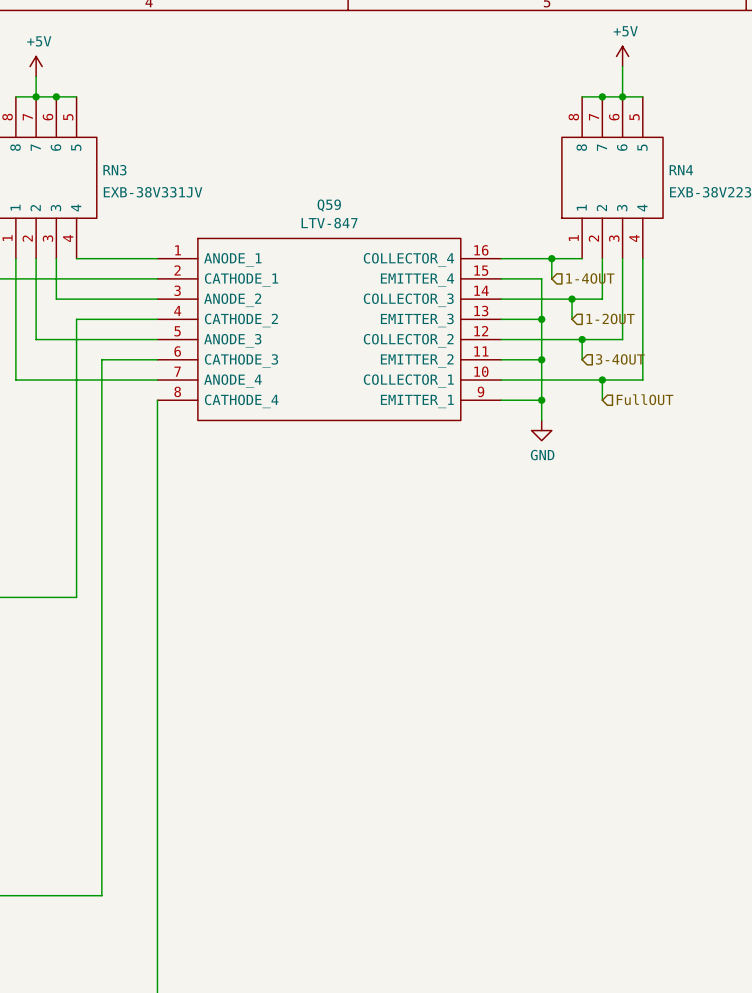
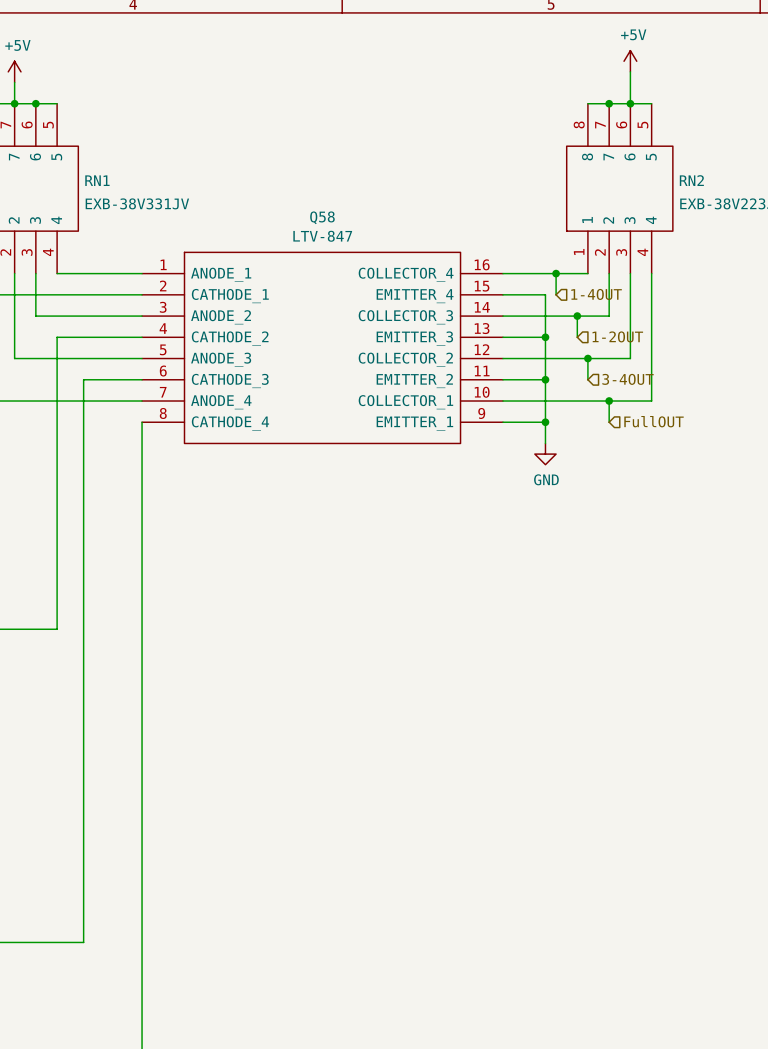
RN3 name: RN3 (114, 170) -> RN1 (97, 180)
RN4 name: RN4 (681, 170) -> RN2 (691, 180)
Q59 name: Q59 (329, 205) -> Q58 (322, 217)

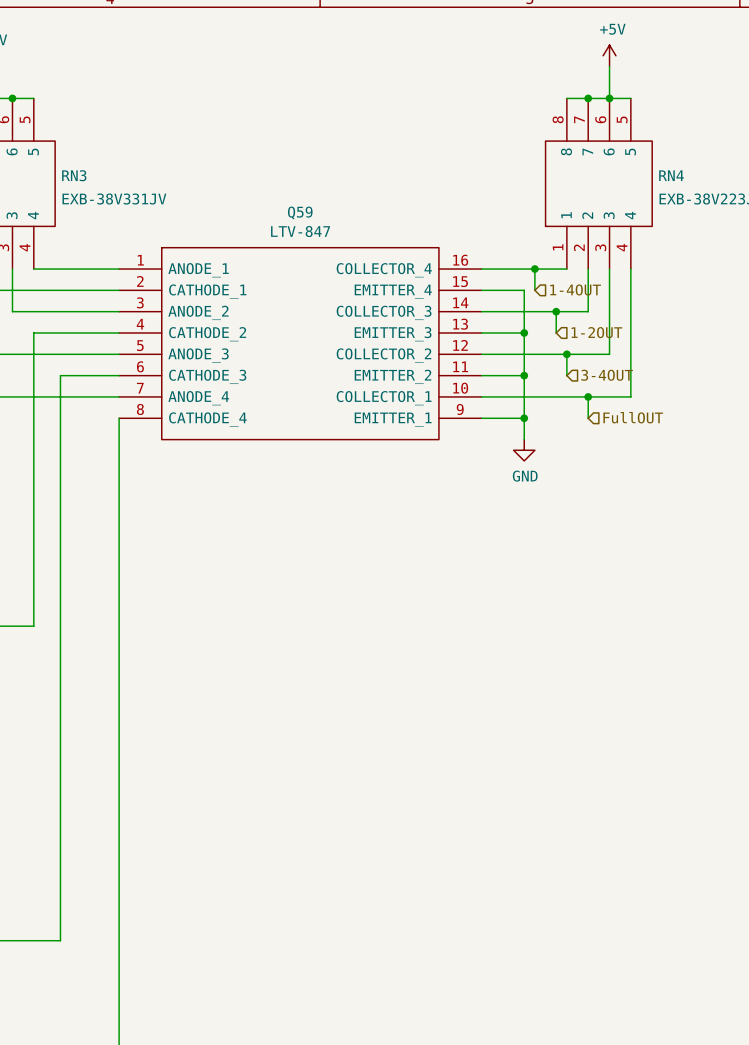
RN1 name: RN1 (97, 180) -> RN3 (74, 175)
RN2 name: RN2 (691, 180) -> RN4 (671, 175)
Q58 name: Q58 (322, 217) -> Q59 (300, 212)

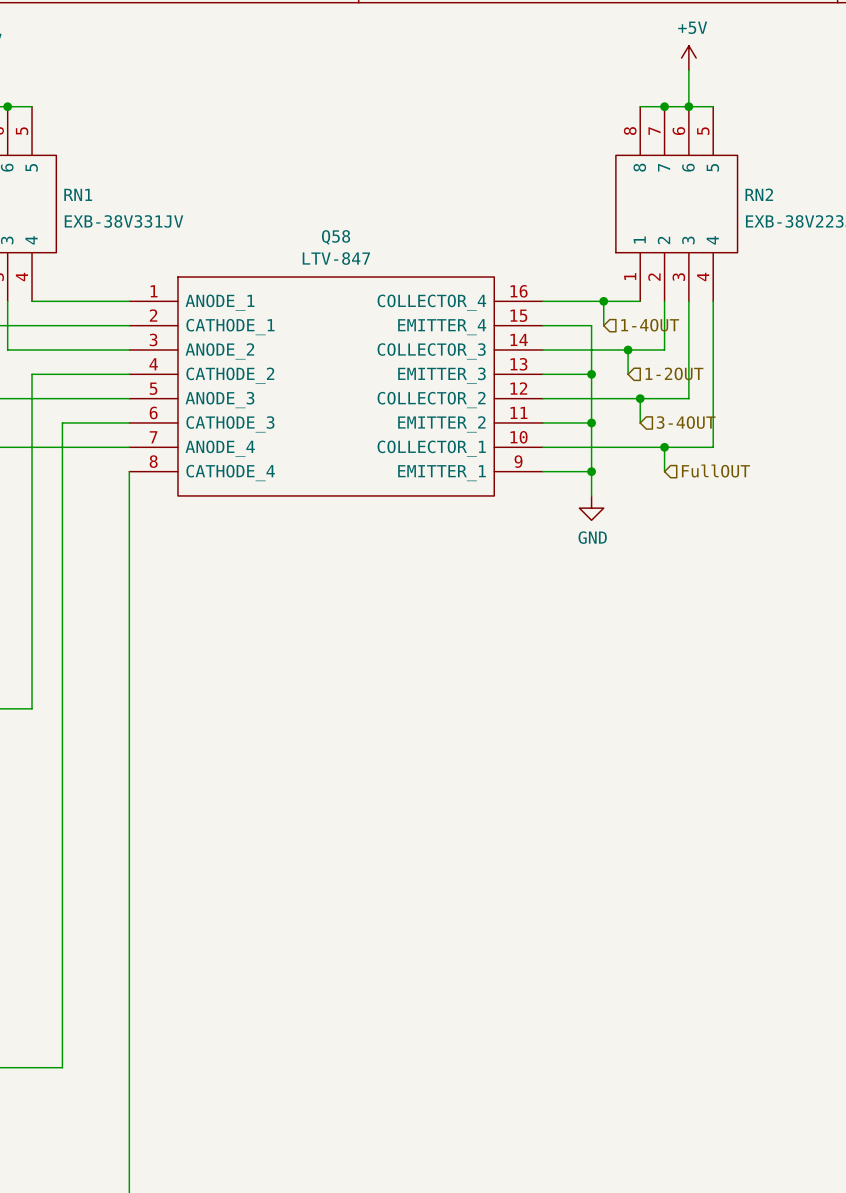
RN3 name: RN3 (74, 175) -> RN1 (78, 194)
RN4 name: RN4 (671, 175) -> RN2 (759, 194)
Q59 name: Q59 (300, 212) -> Q58 (336, 237)

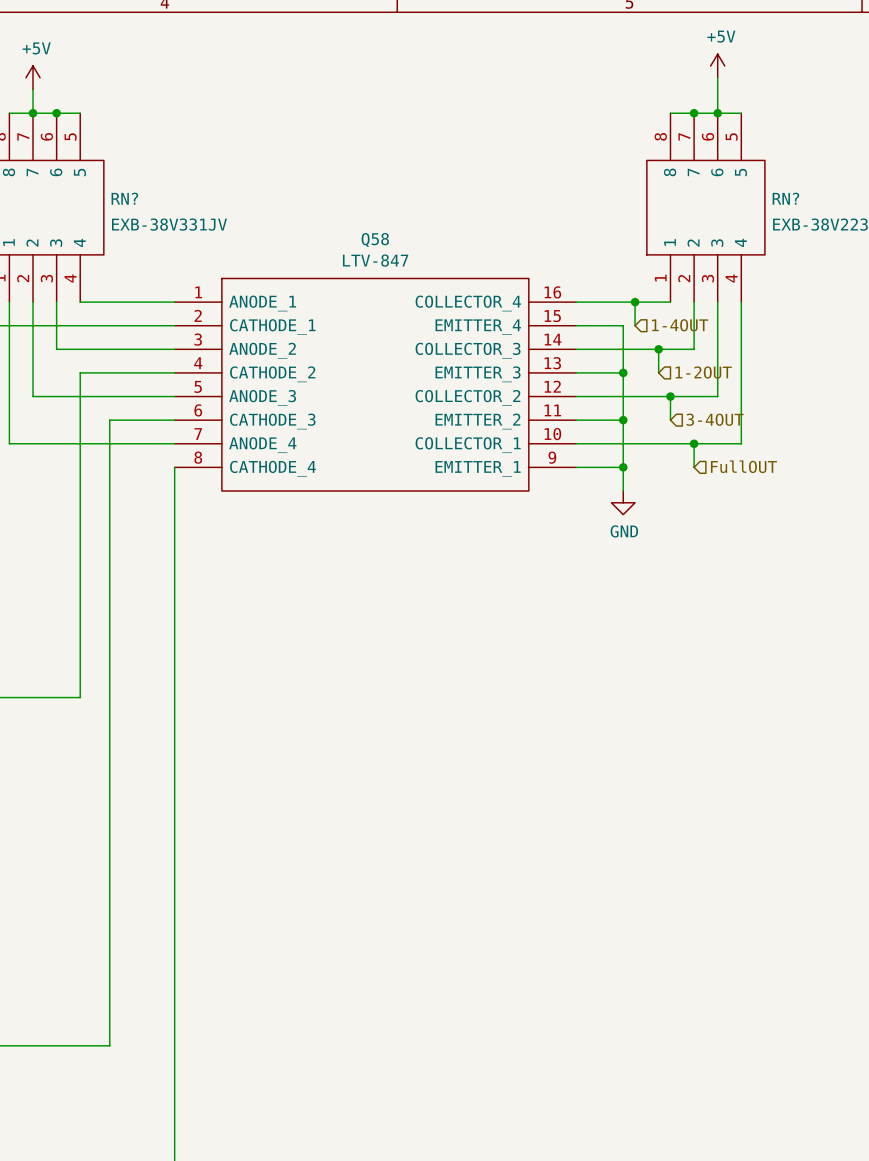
RN1 name: RN1 (78, 194) -> RN? (124, 198)
RN2 name: RN2 (759, 194) -> RN? (785, 198)

